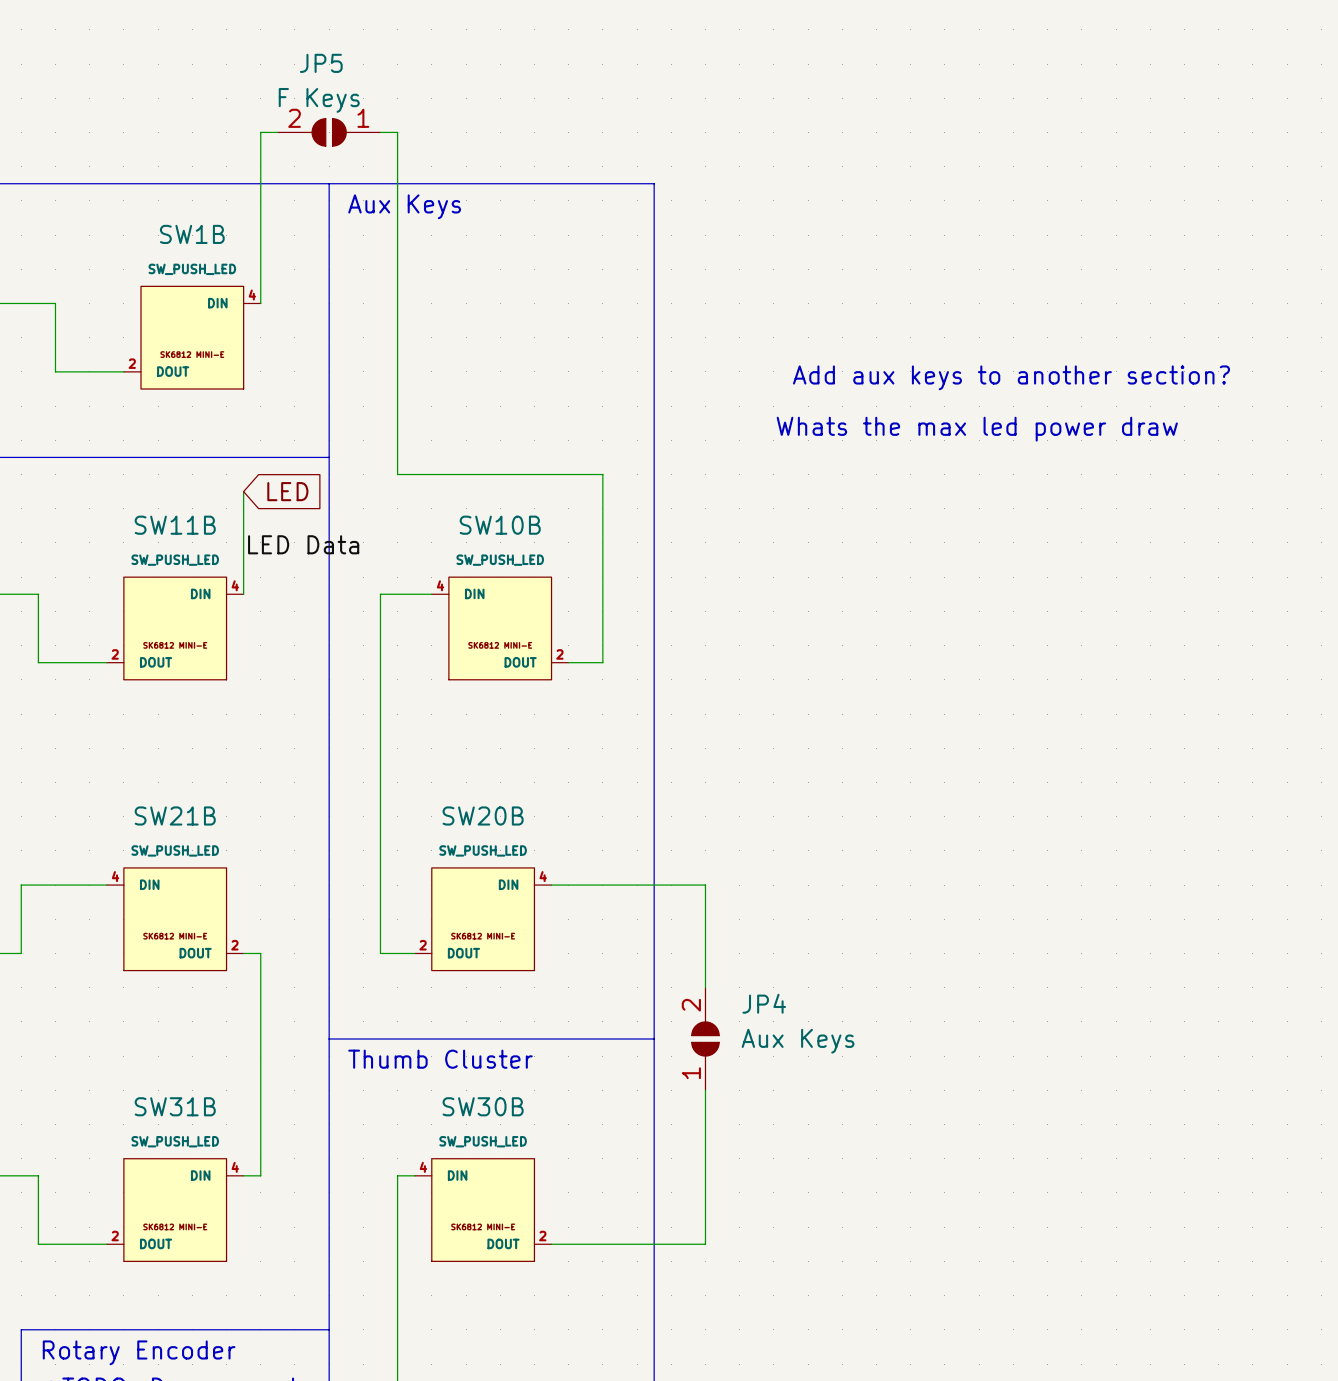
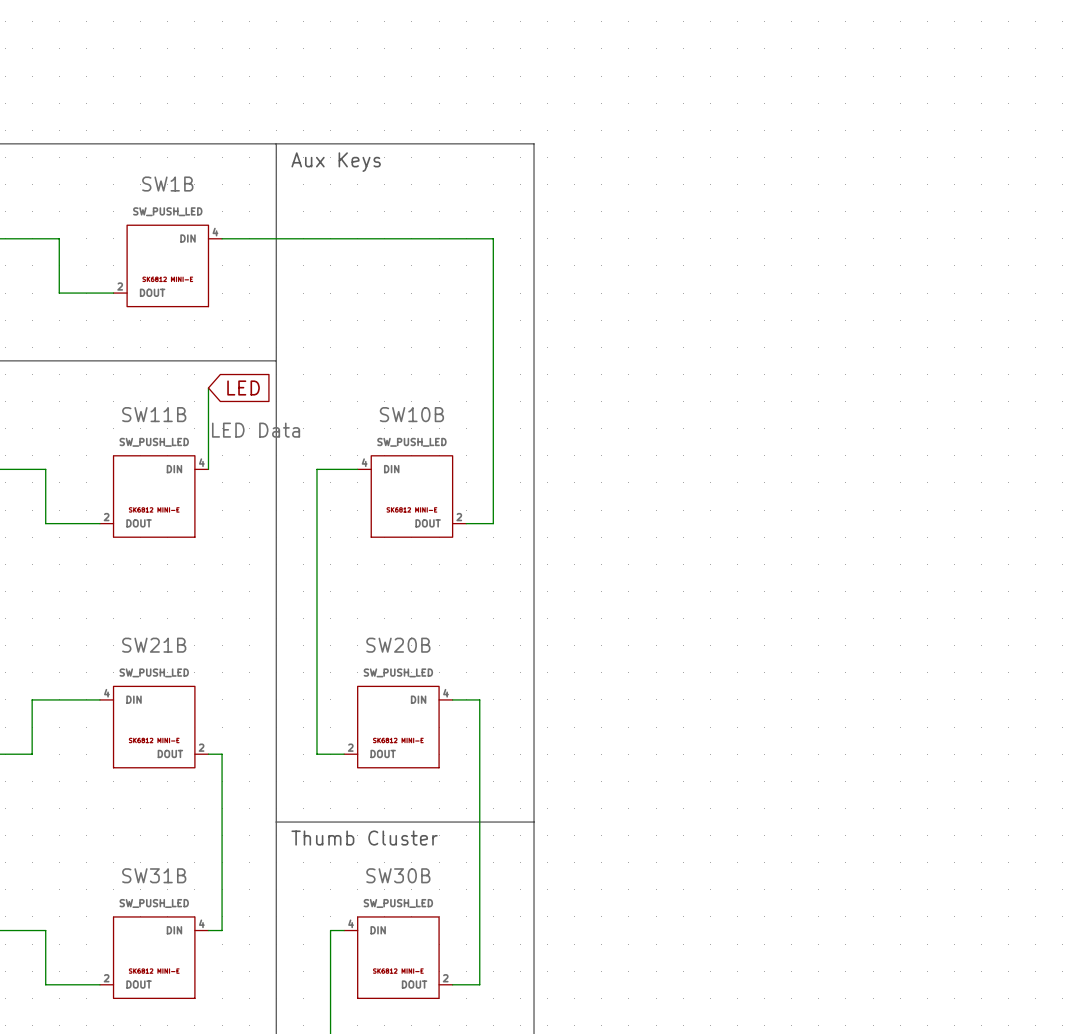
wire: (277, 132) (260, 132) (260, 303) -> none
JP5: F Keys (329, 132) -> none
wire: (380, 132) (397, 132) (397, 474) (602, 474) -> (222, 238) (493, 238) (493, 374)
text: Add aux keys to another section? (1011, 377) -> none
text: Whats the max led power draw (977, 429) -> none
wire: (585, 885) (705, 885) (705, 987) -> none
JP4: Aux Keys (705, 1039) -> none
wire: (705, 1090) (705, 1244) (585, 1244) -> (479, 699) (479, 984)

